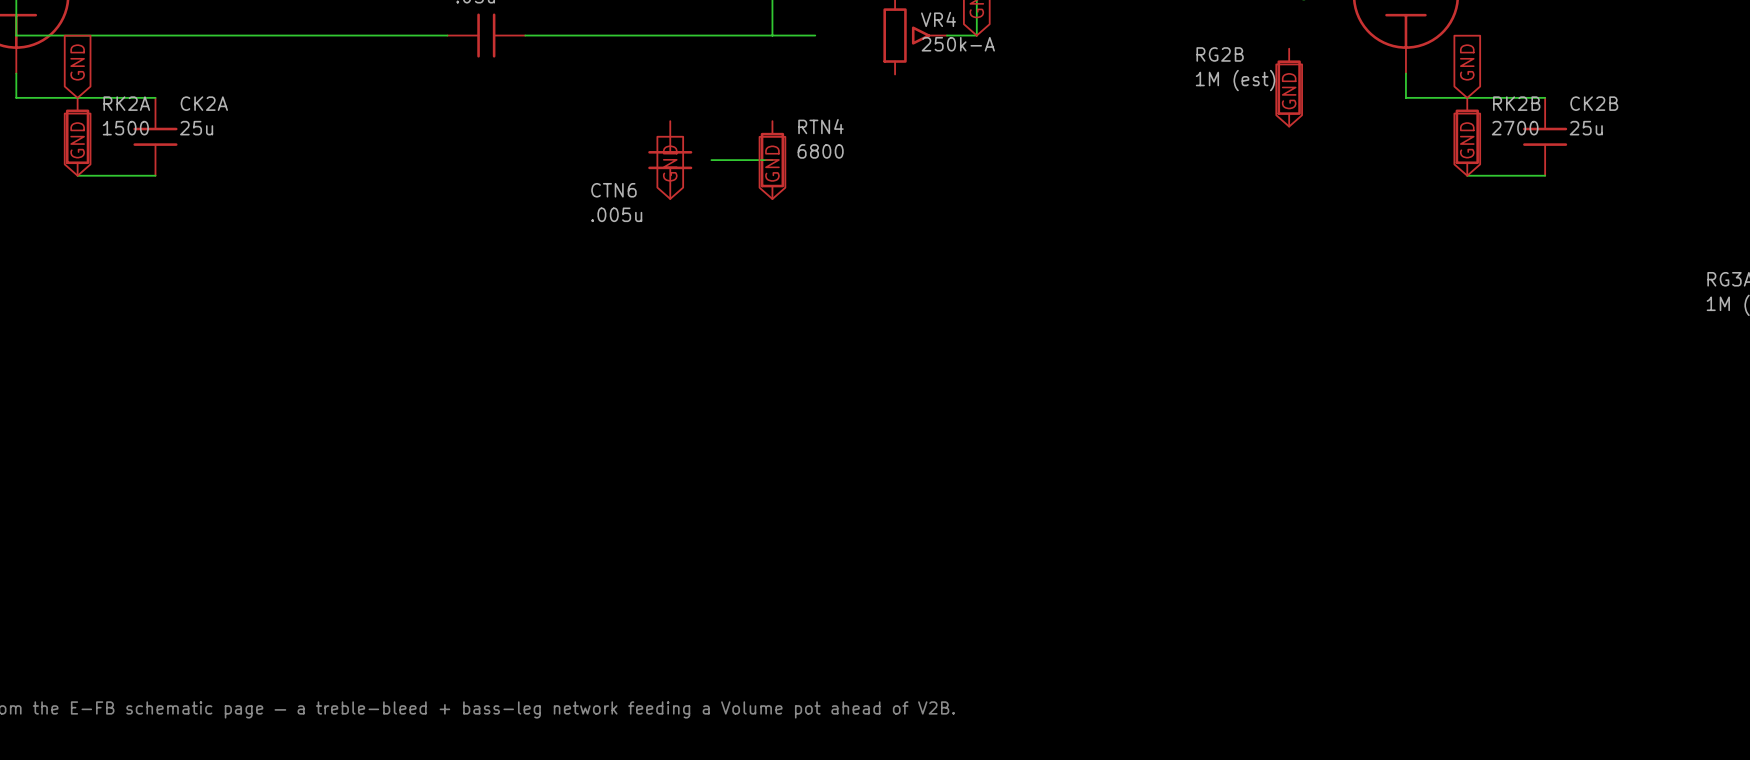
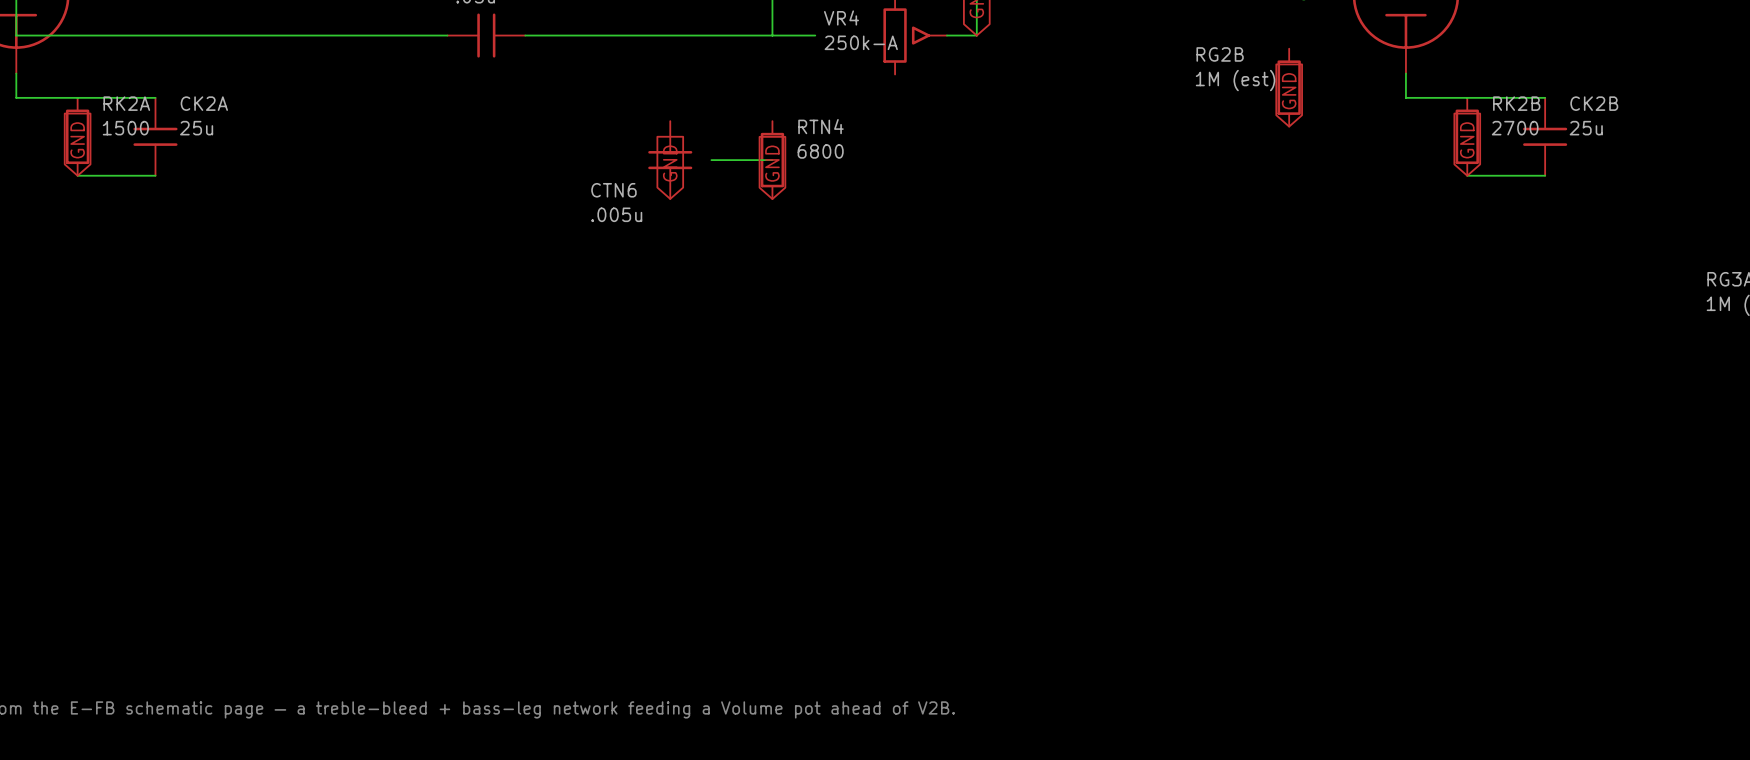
VR4 name position: VR4 (938, 19) -> VR4 (841, 17)
VR4 value position: 250k-A (958, 44) -> 250k-A (861, 42)
global label: GND (77, 62) -> none
global label: GND (1467, 62) -> none

